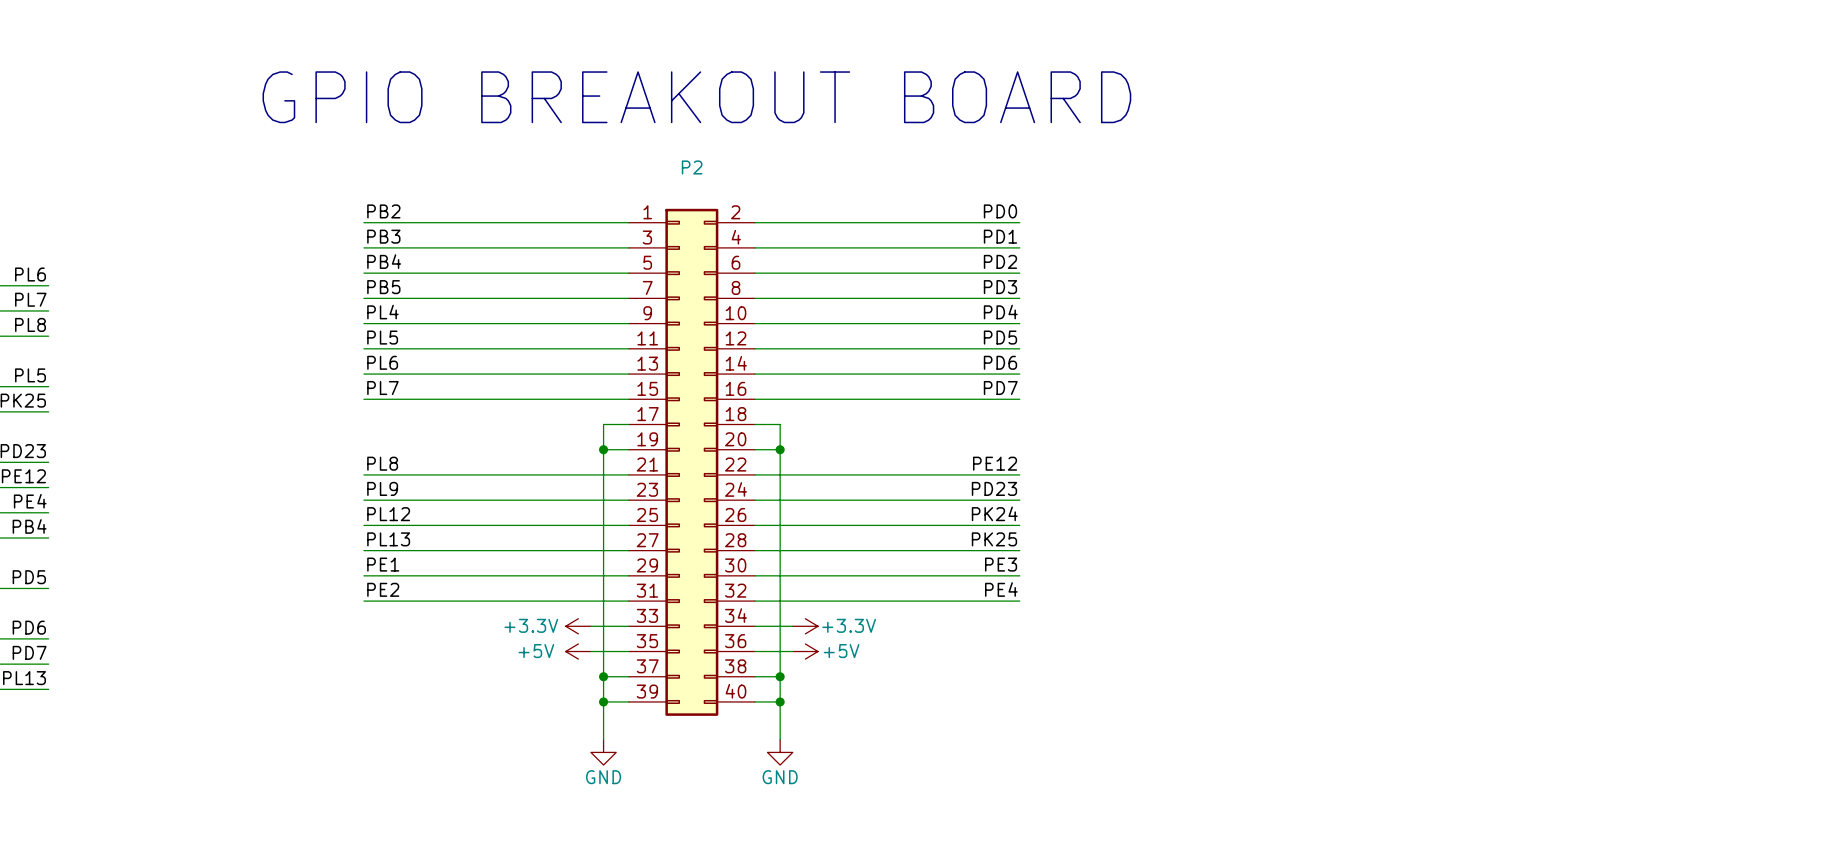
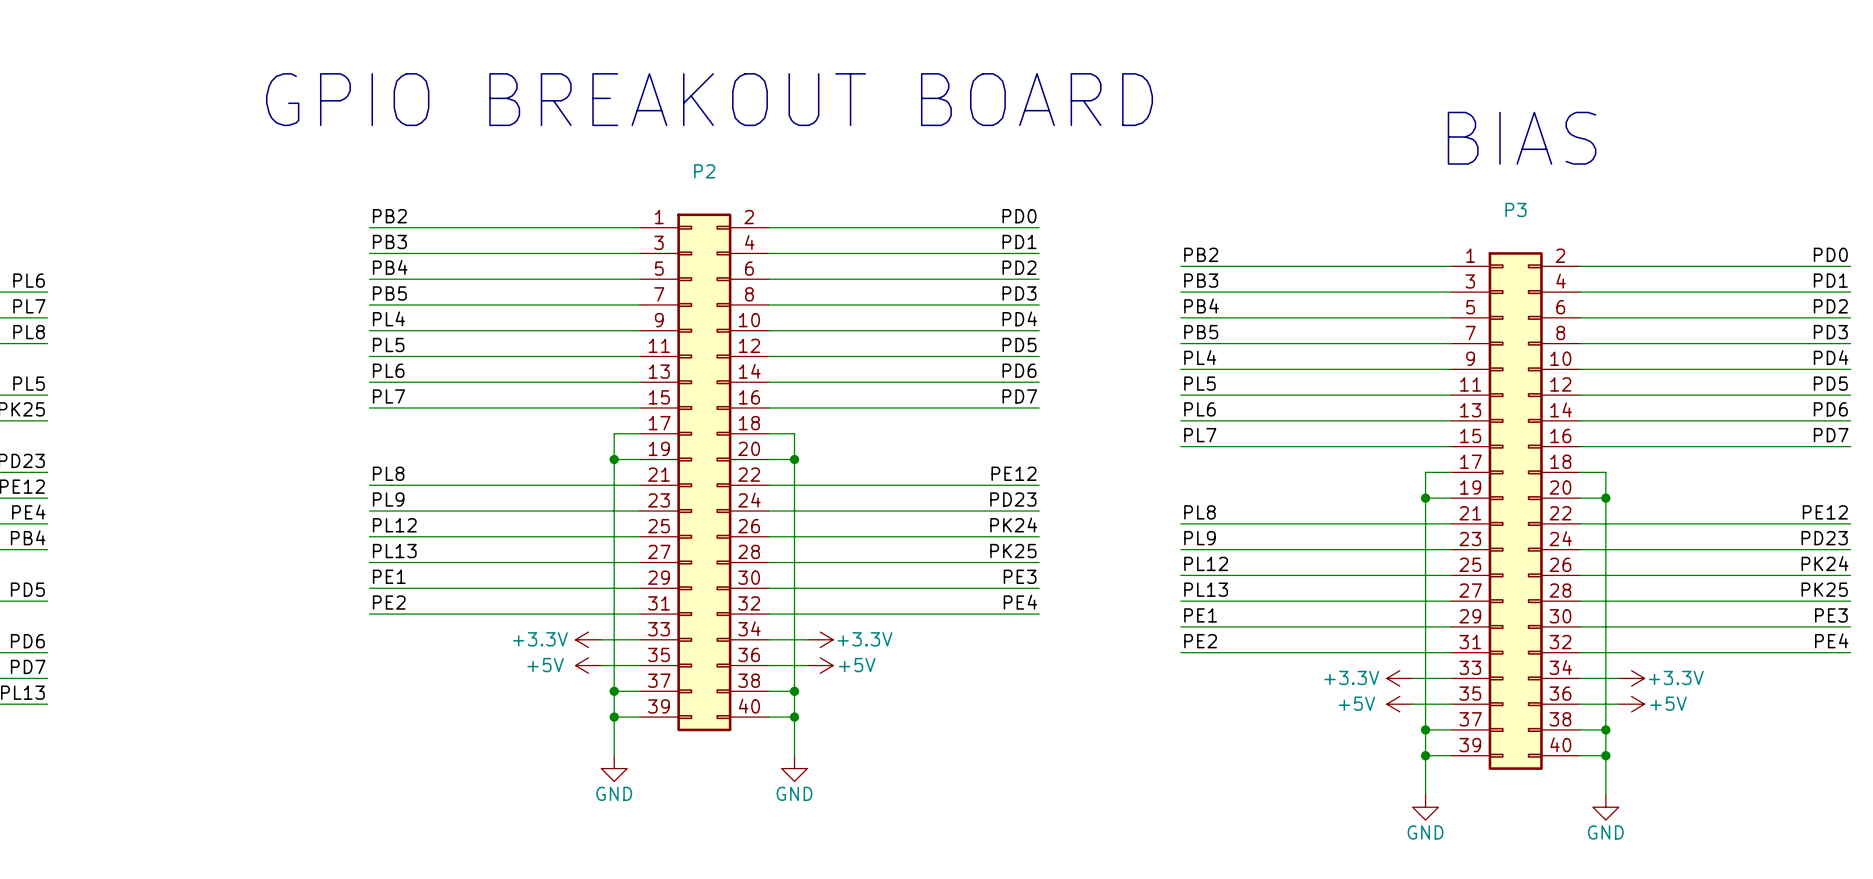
text: none -> BIAS (1522, 138)
label: none -> PB2 (1201, 254)
label: none -> PD0 (1830, 254)
wire: none -> (1180, 266) (1451, 266)
wire: none -> (1580, 266) (1850, 266)
label: none -> PB3 (1201, 280)
label: none -> PD1 (1830, 280)
wire: none -> (1180, 292) (1451, 292)
wire: none -> (1580, 292) (1850, 292)
label: none -> PB4 (1201, 306)
label: none -> PD2 (1830, 306)
wire: none -> (1180, 317) (1451, 317)
wire: none -> (1580, 317) (1850, 317)
label: none -> PB5 (1201, 332)
label: none -> PD3 (1830, 332)
wire: none -> (1180, 343) (1451, 343)
wire: none -> (1580, 343) (1850, 343)
label: none -> PL4 (1200, 357)
label: none -> PD4 (1831, 357)
wire: none -> (1180, 369) (1451, 369)
wire: none -> (1580, 369) (1850, 369)
label: none -> PL5 (1199, 383)
label: none -> PD5 (1830, 383)
wire: none -> (1180, 395) (1451, 395)
wire: none -> (1580, 395) (1850, 395)
label: none -> PL6 (1199, 409)
label: none -> PD6 (1830, 409)
wire: none -> (1180, 420) (1451, 420)
wire: none -> (1580, 420) (1850, 420)
label: none -> PL7 (1200, 435)
label: none -> PD7 (1831, 435)
wire: none -> (1180, 446) (1451, 446)
wire: none -> (1580, 446) (1850, 446)
wire: none -> (1451, 472) (1425, 472) (1425, 794)
wire: none -> (1580, 472) (1605, 472) (1605, 794)
wire: none -> (1425, 498) (1451, 498)
junction: none -> (1425, 498)
wire: none -> (1580, 498) (1605, 498)
junction: none -> (1605, 498)
P3: none -> (1515, 511)
label: none -> PL8 (1199, 512)
label: none -> PE12 (1825, 512)
wire: none -> (1180, 523) (1451, 523)
wire: none -> (1580, 523) (1850, 523)
label: none -> PL9 (1199, 538)
label: none -> PD23 (1824, 538)
wire: none -> (1180, 549) (1451, 549)
wire: none -> (1580, 549) (1850, 549)
label: none -> PL12 (1206, 563)
label: none -> PK24 (1824, 563)
wire: none -> (1180, 575) (1451, 575)
wire: none -> (1580, 575) (1850, 575)
label: none -> PL13 (1206, 589)
label: none -> PK25 (1824, 589)
wire: none -> (1180, 601) (1451, 601)
wire: none -> (1580, 601) (1850, 601)
label: none -> PE1 (1200, 615)
label: none -> PE3 (1831, 615)
wire: none -> (1180, 626) (1451, 626)
wire: none -> (1580, 626) (1850, 626)
label: none -> PE2 (1200, 641)
label: none -> PE4 (1831, 640)
wire: none -> (1180, 652) (1451, 652)
wire: none -> (1580, 652) (1850, 652)
power symbol: none -> +3.3V (1399, 678)
wire: none -> (1412, 678) (1451, 678)
wire: none -> (1580, 678) (1618, 678)
power symbol: none -> +3.3V (1631, 678)
power symbol: none -> +5V (1399, 704)
wire: none -> (1412, 704) (1451, 704)
wire: none -> (1580, 704) (1618, 704)
power symbol: none -> +5V (1631, 704)
wire: none -> (1425, 729) (1451, 729)
junction: none -> (1425, 729)
wire: none -> (1580, 729) (1605, 729)
junction: none -> (1605, 729)
wire: none -> (1425, 755) (1451, 755)
junction: none -> (1425, 755)
wire: none -> (1580, 755) (1605, 755)
junction: none -> (1605, 755)
power symbol: none -> GND (1425, 807)
power symbol: none -> GND (1605, 807)

